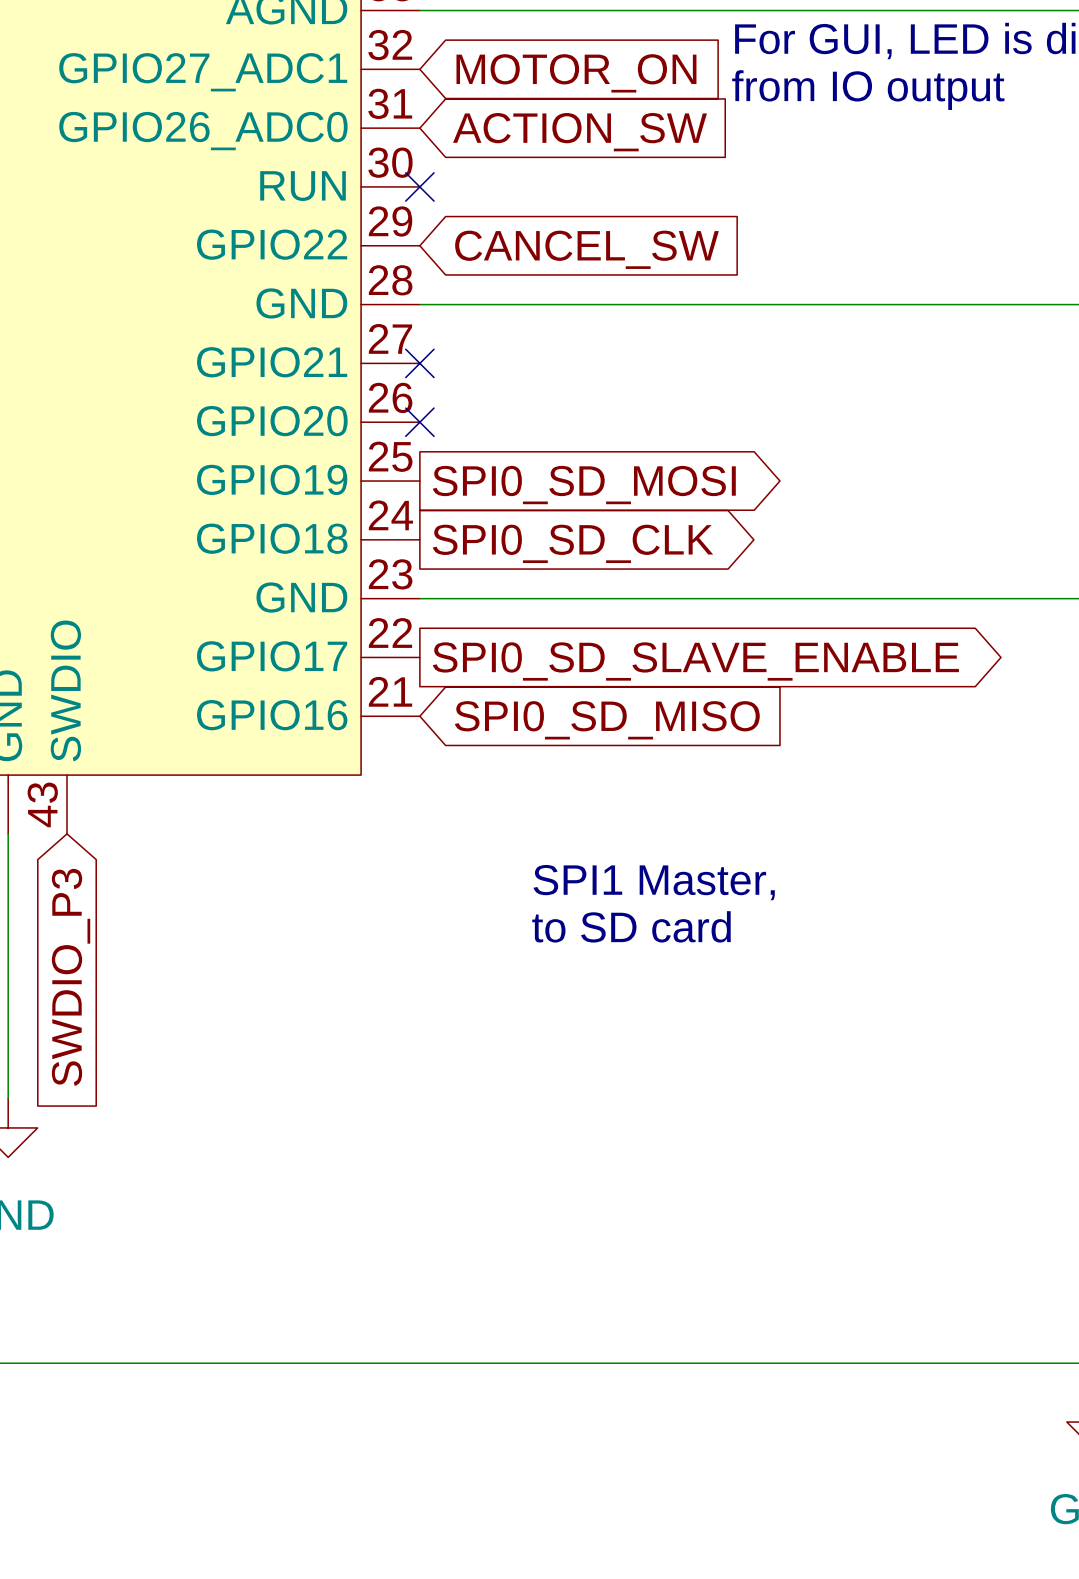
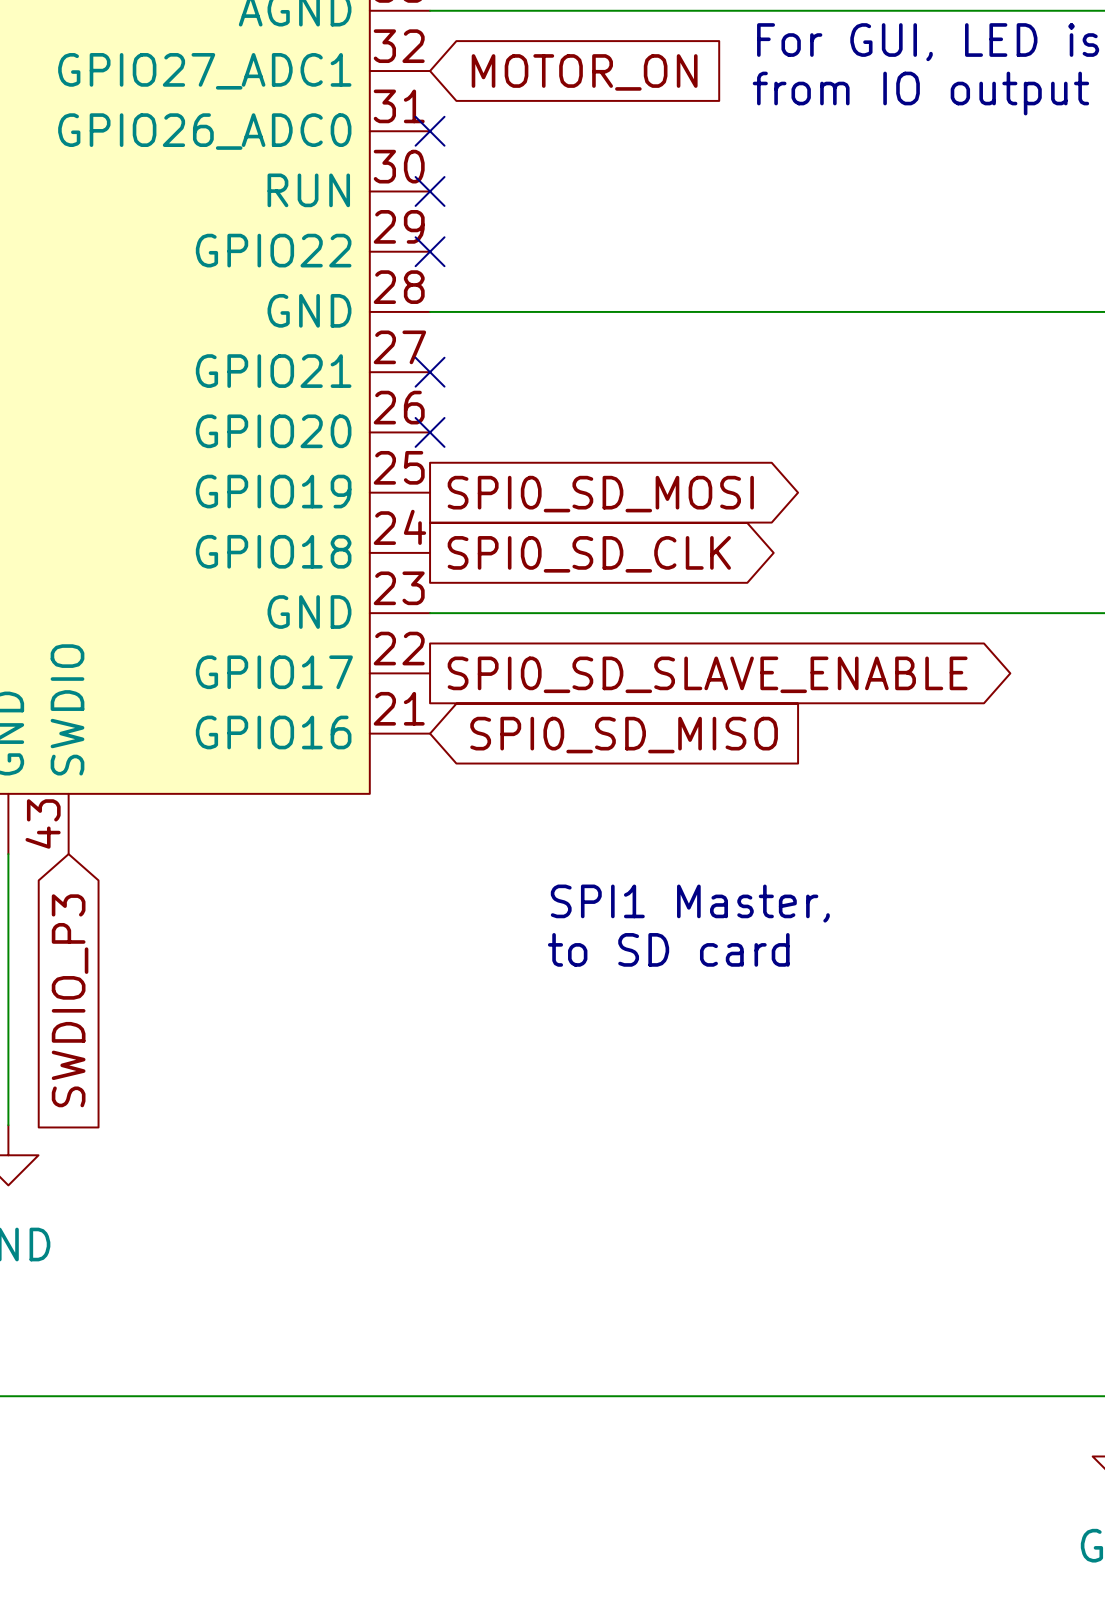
no-connect mark: none -> (430, 131)
global label: ACTION_SW (579, 132) -> none
no-connect mark: none -> (430, 251)
global label: CANCEL_SW (586, 249) -> none

